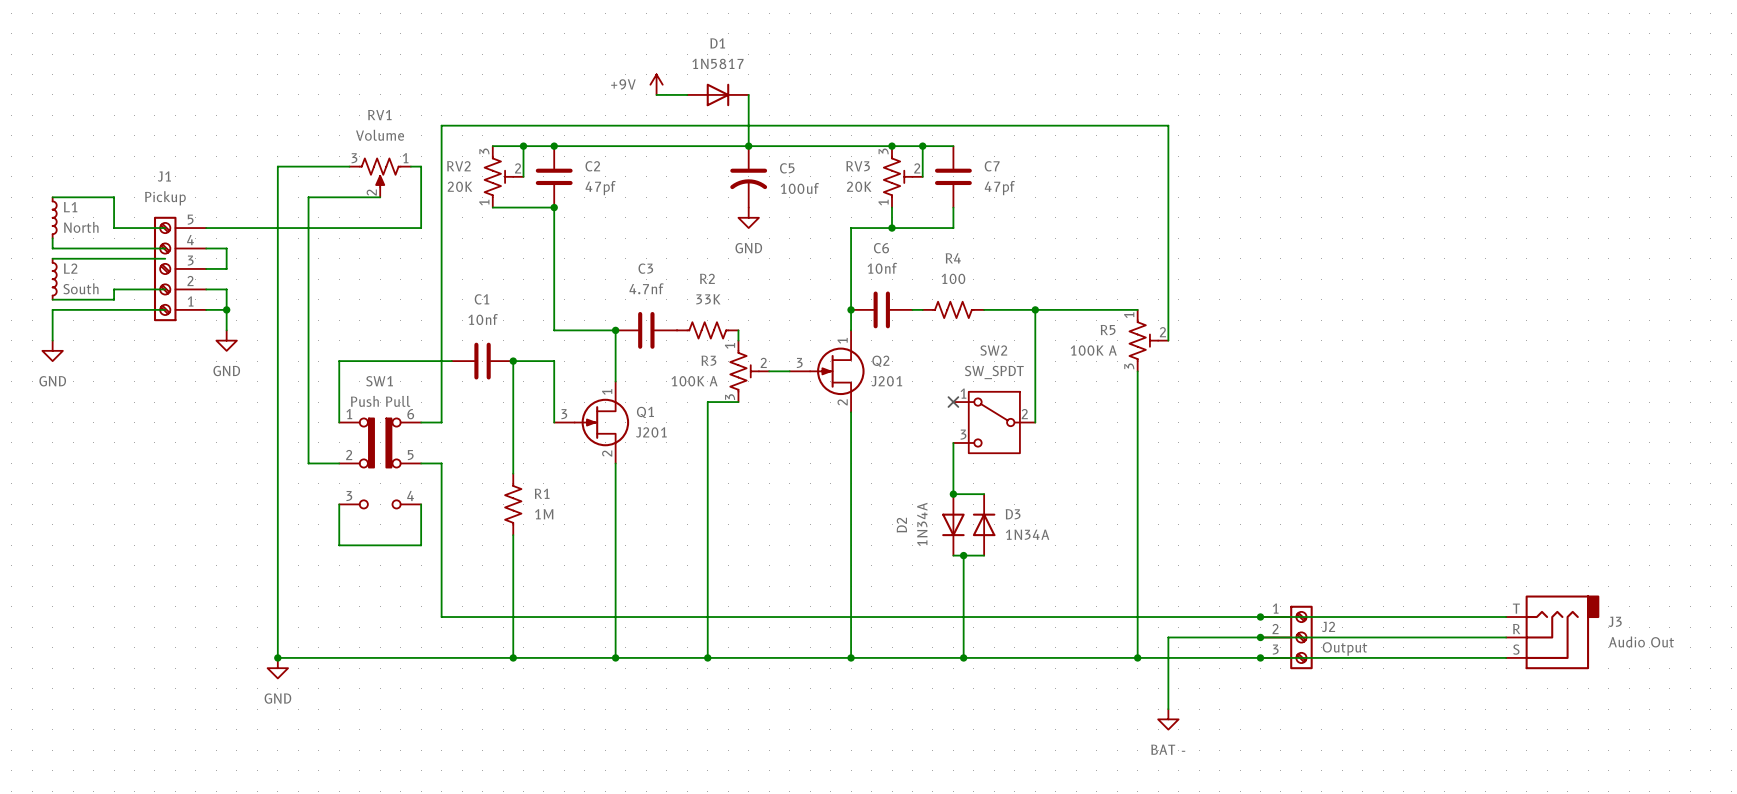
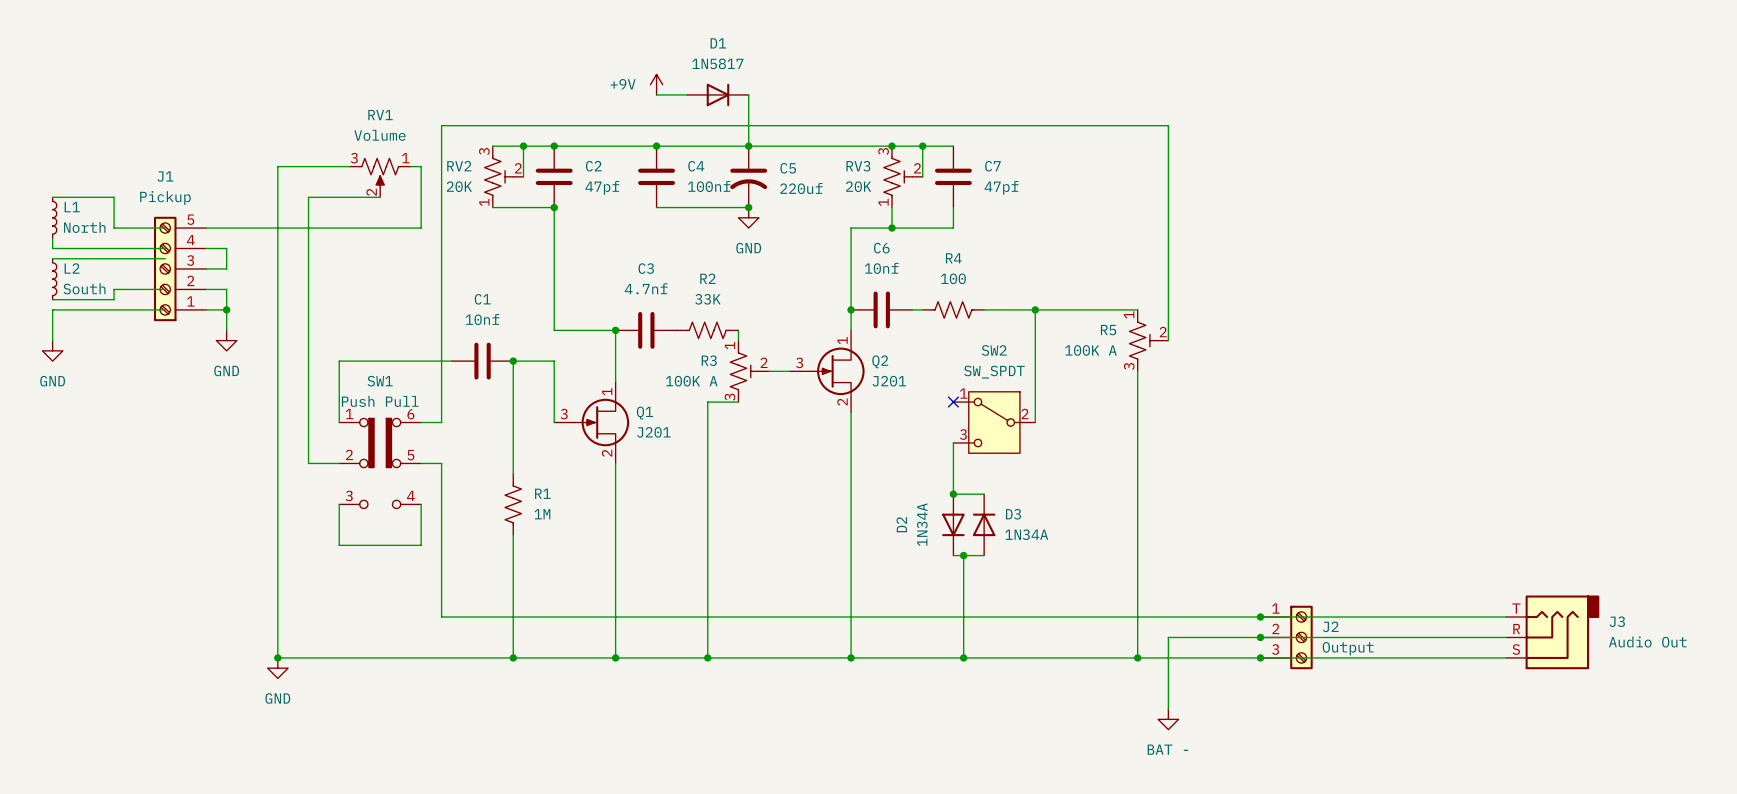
junction: none -> (656, 146)
C4: none -> 100nf (656, 176)
C5 value: 100uf (799, 188) -> 220uf (801, 188)
wire: none -> (656, 207) (748, 207)
junction: none -> (748, 207)

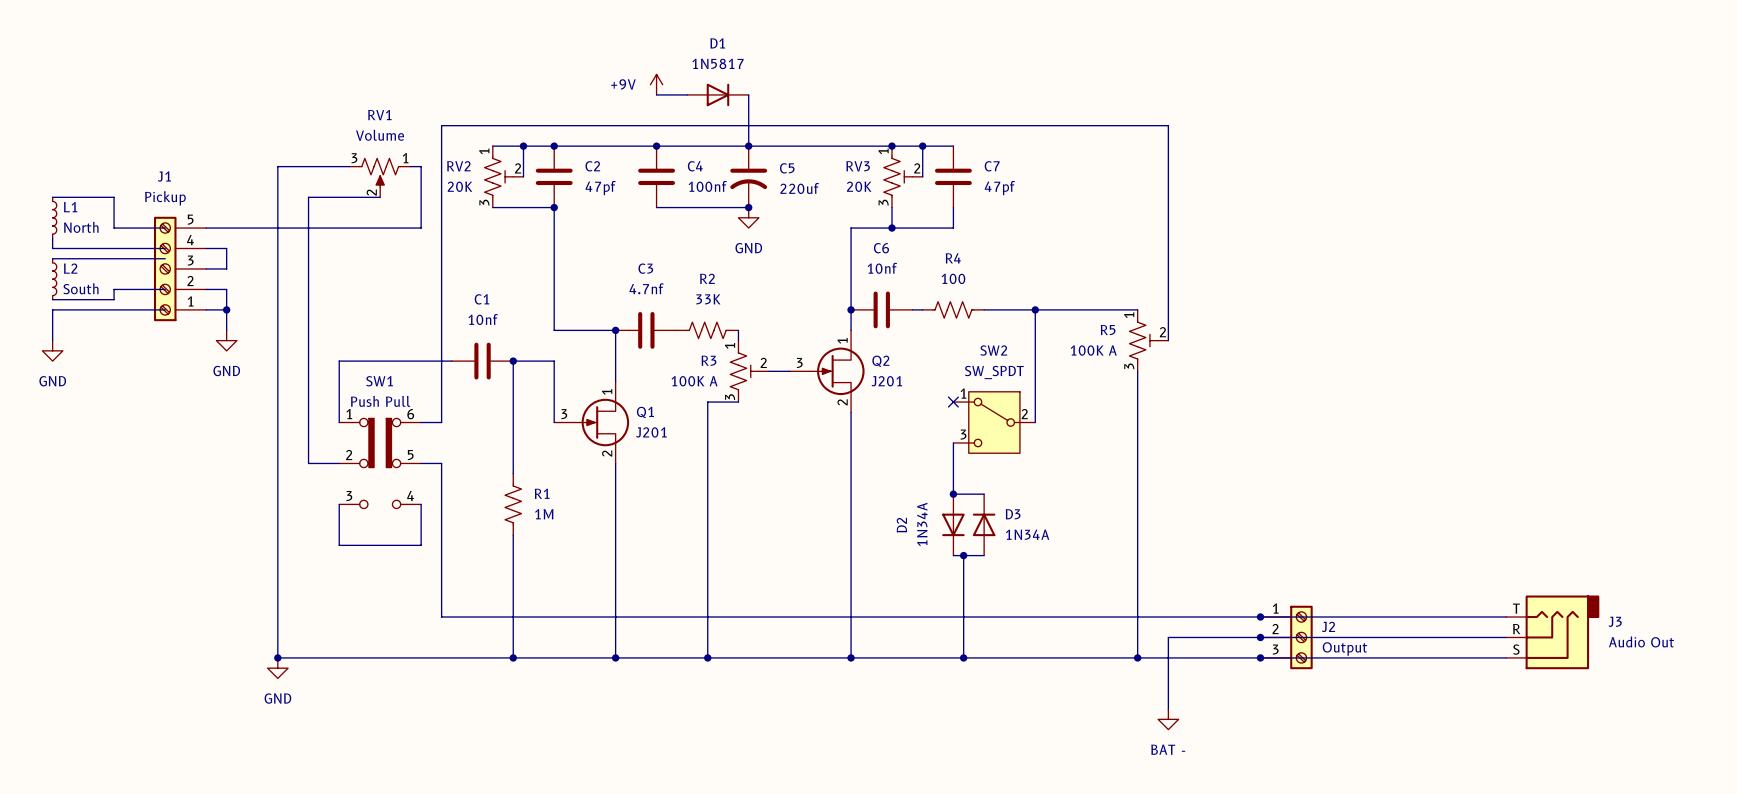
RV2 pin number: 3 (484, 151) -> 1 (484, 151)
RV3 pin number: 3 (883, 151) -> 1 (883, 151)
RV2 pin number: 1 (484, 202) -> 3 (484, 202)
RV3 pin number: 1 (883, 202) -> 3 (883, 202)

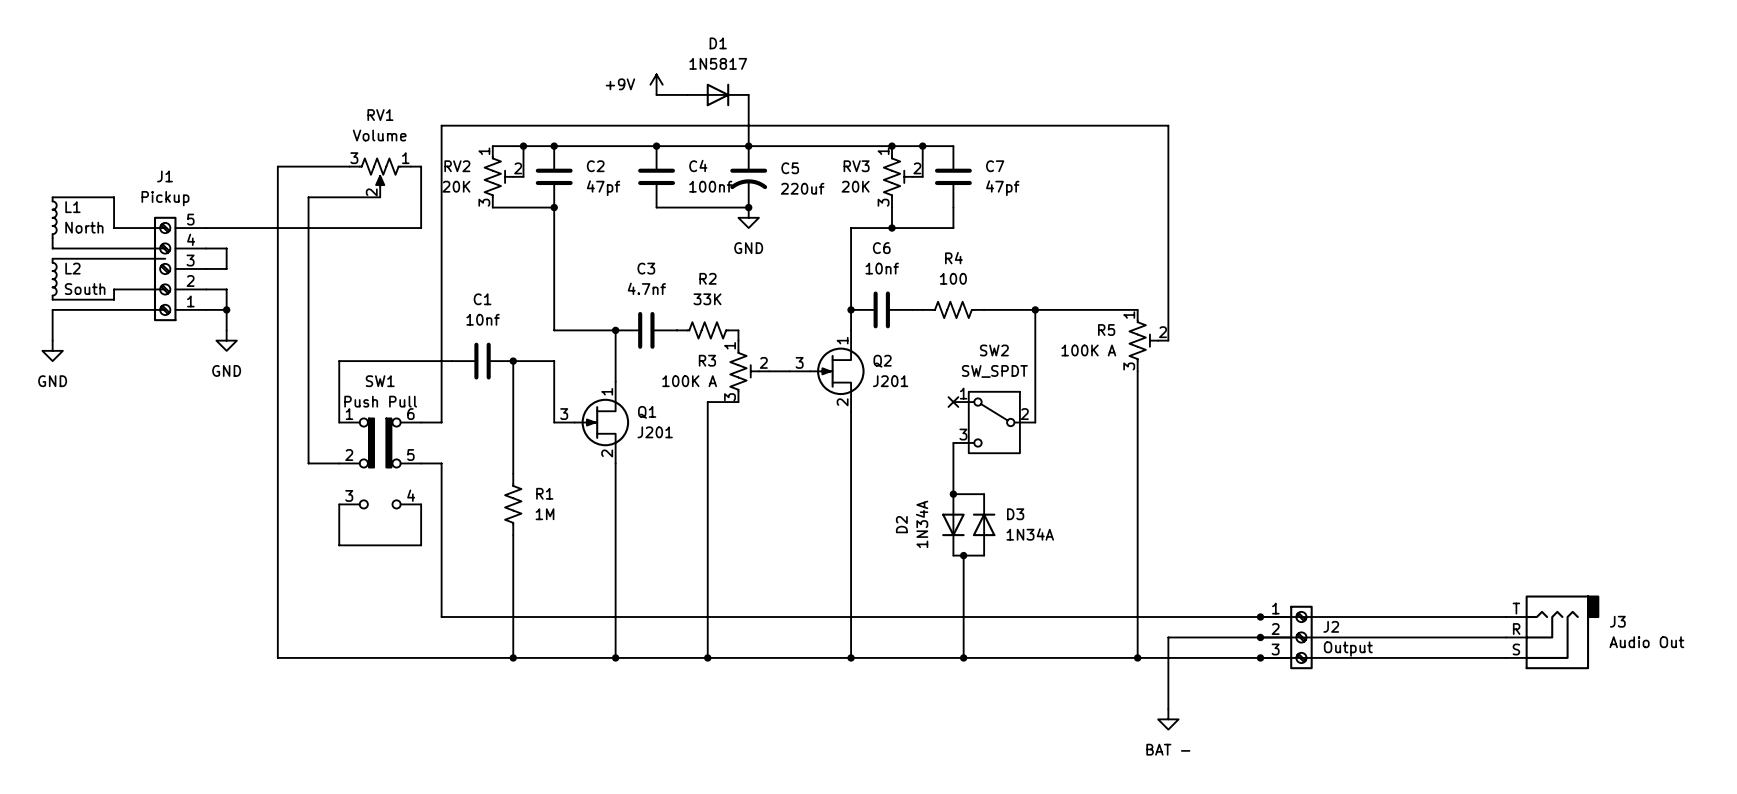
junction: (277, 657) -> none
power symbol: GND (277, 668) -> none

